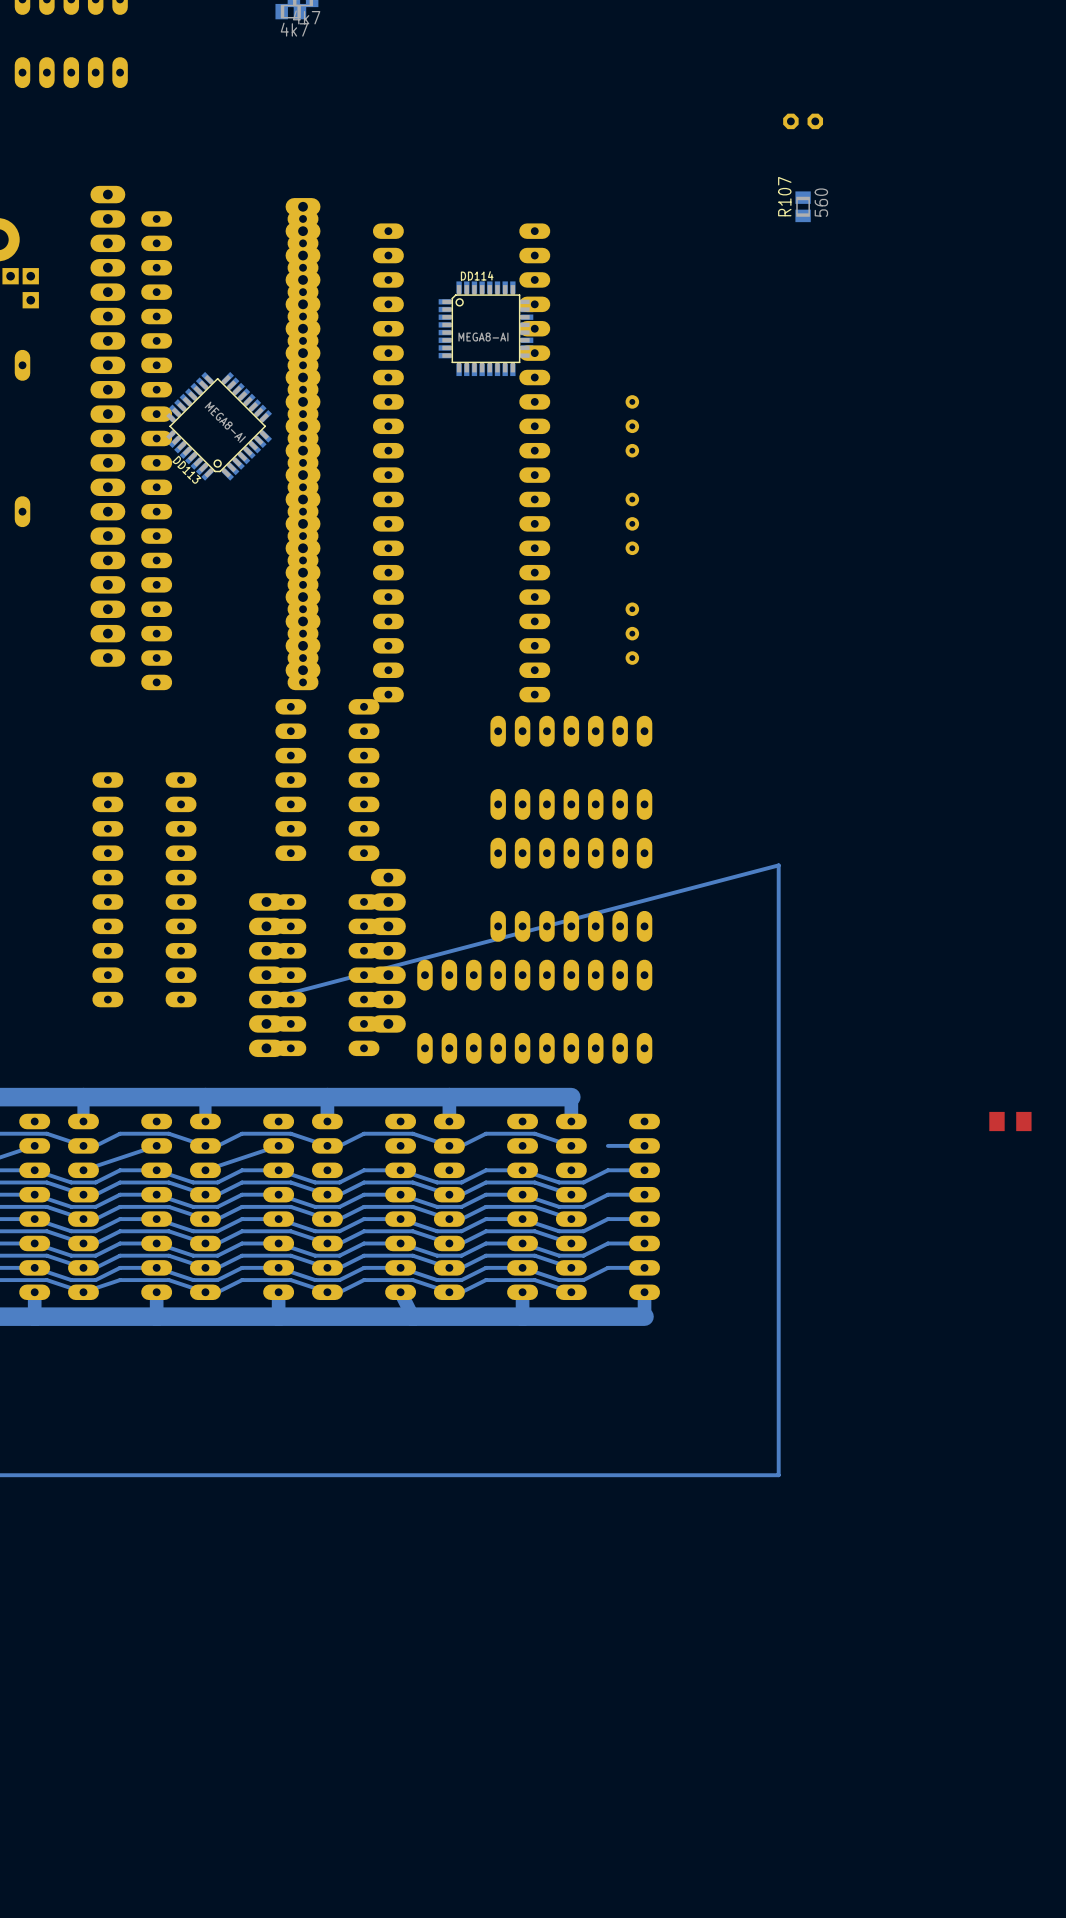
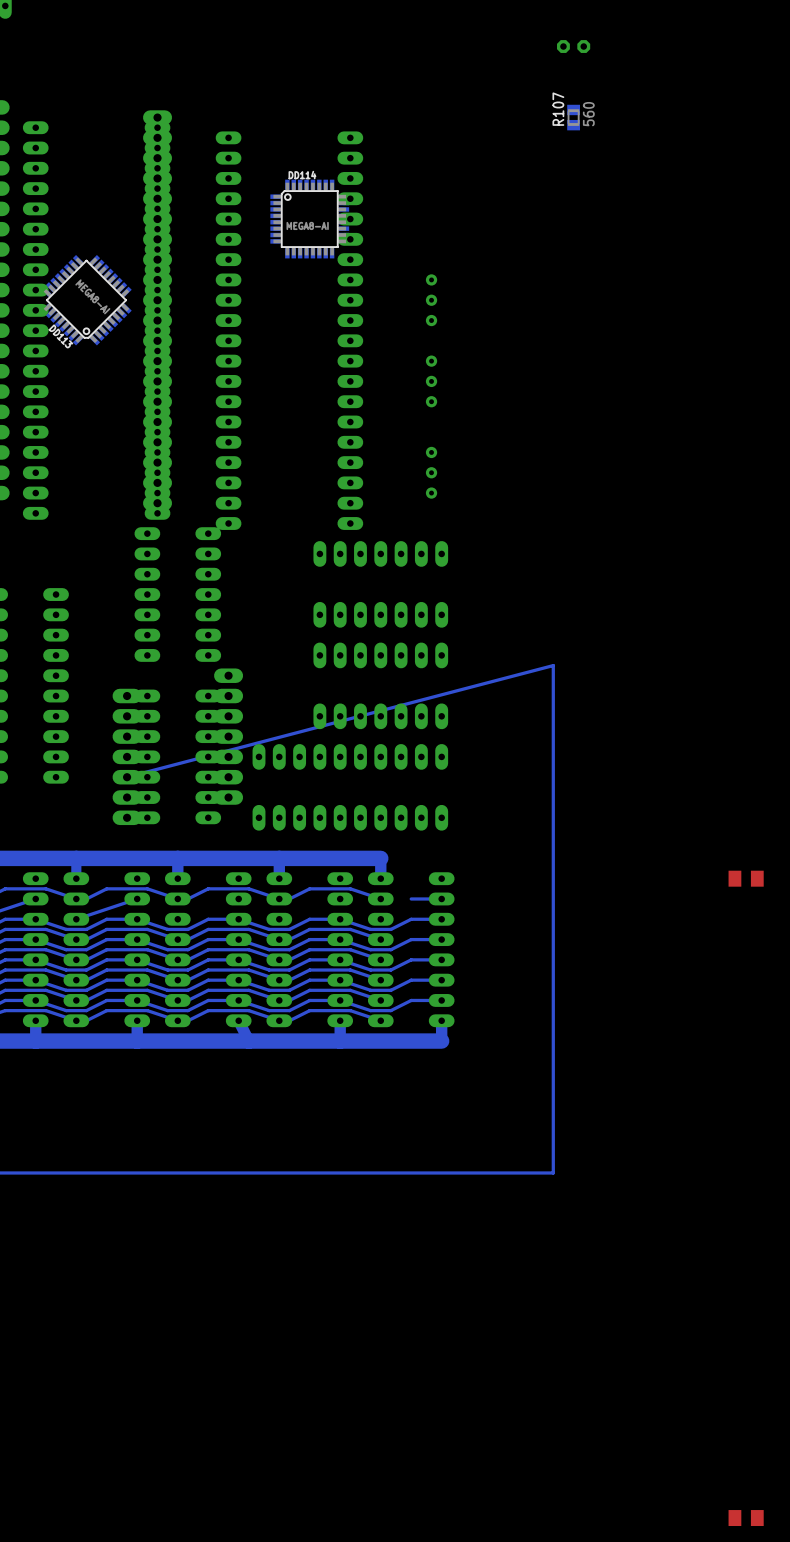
part: none -> (746, 1518)

